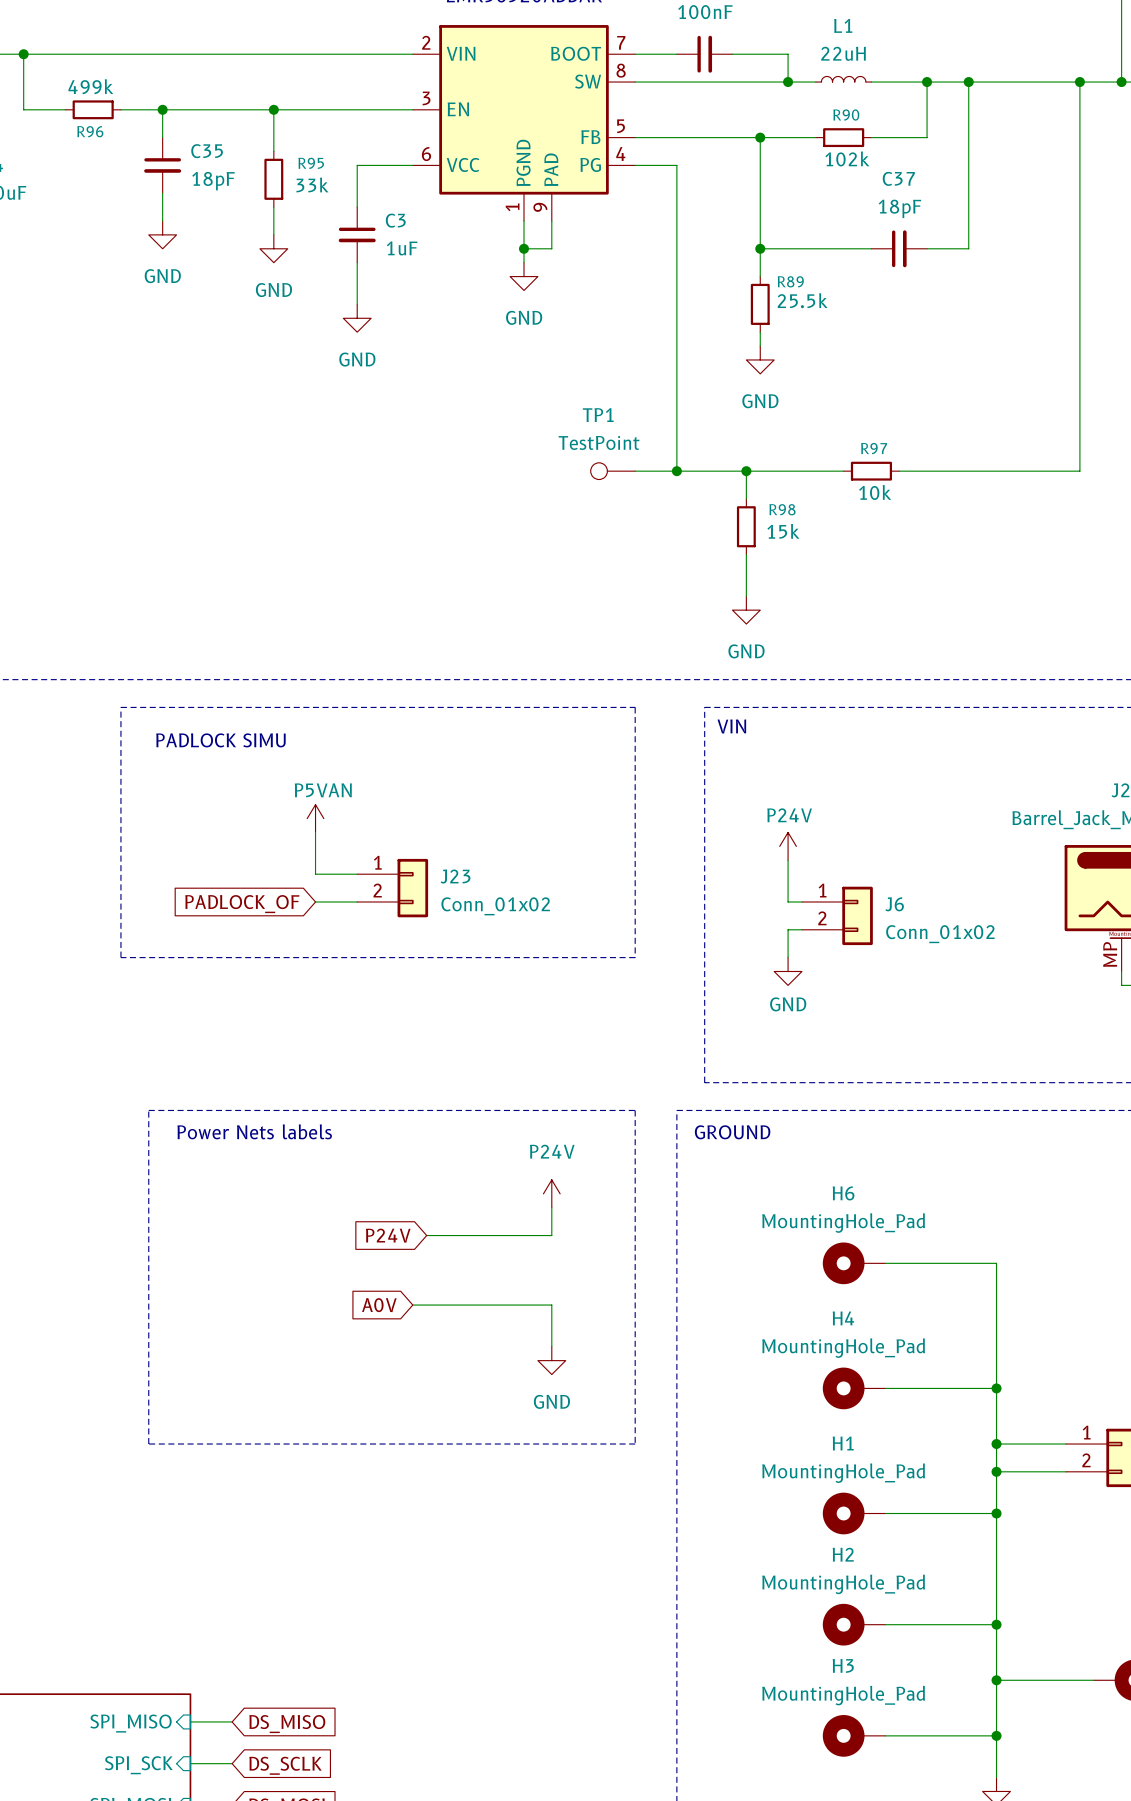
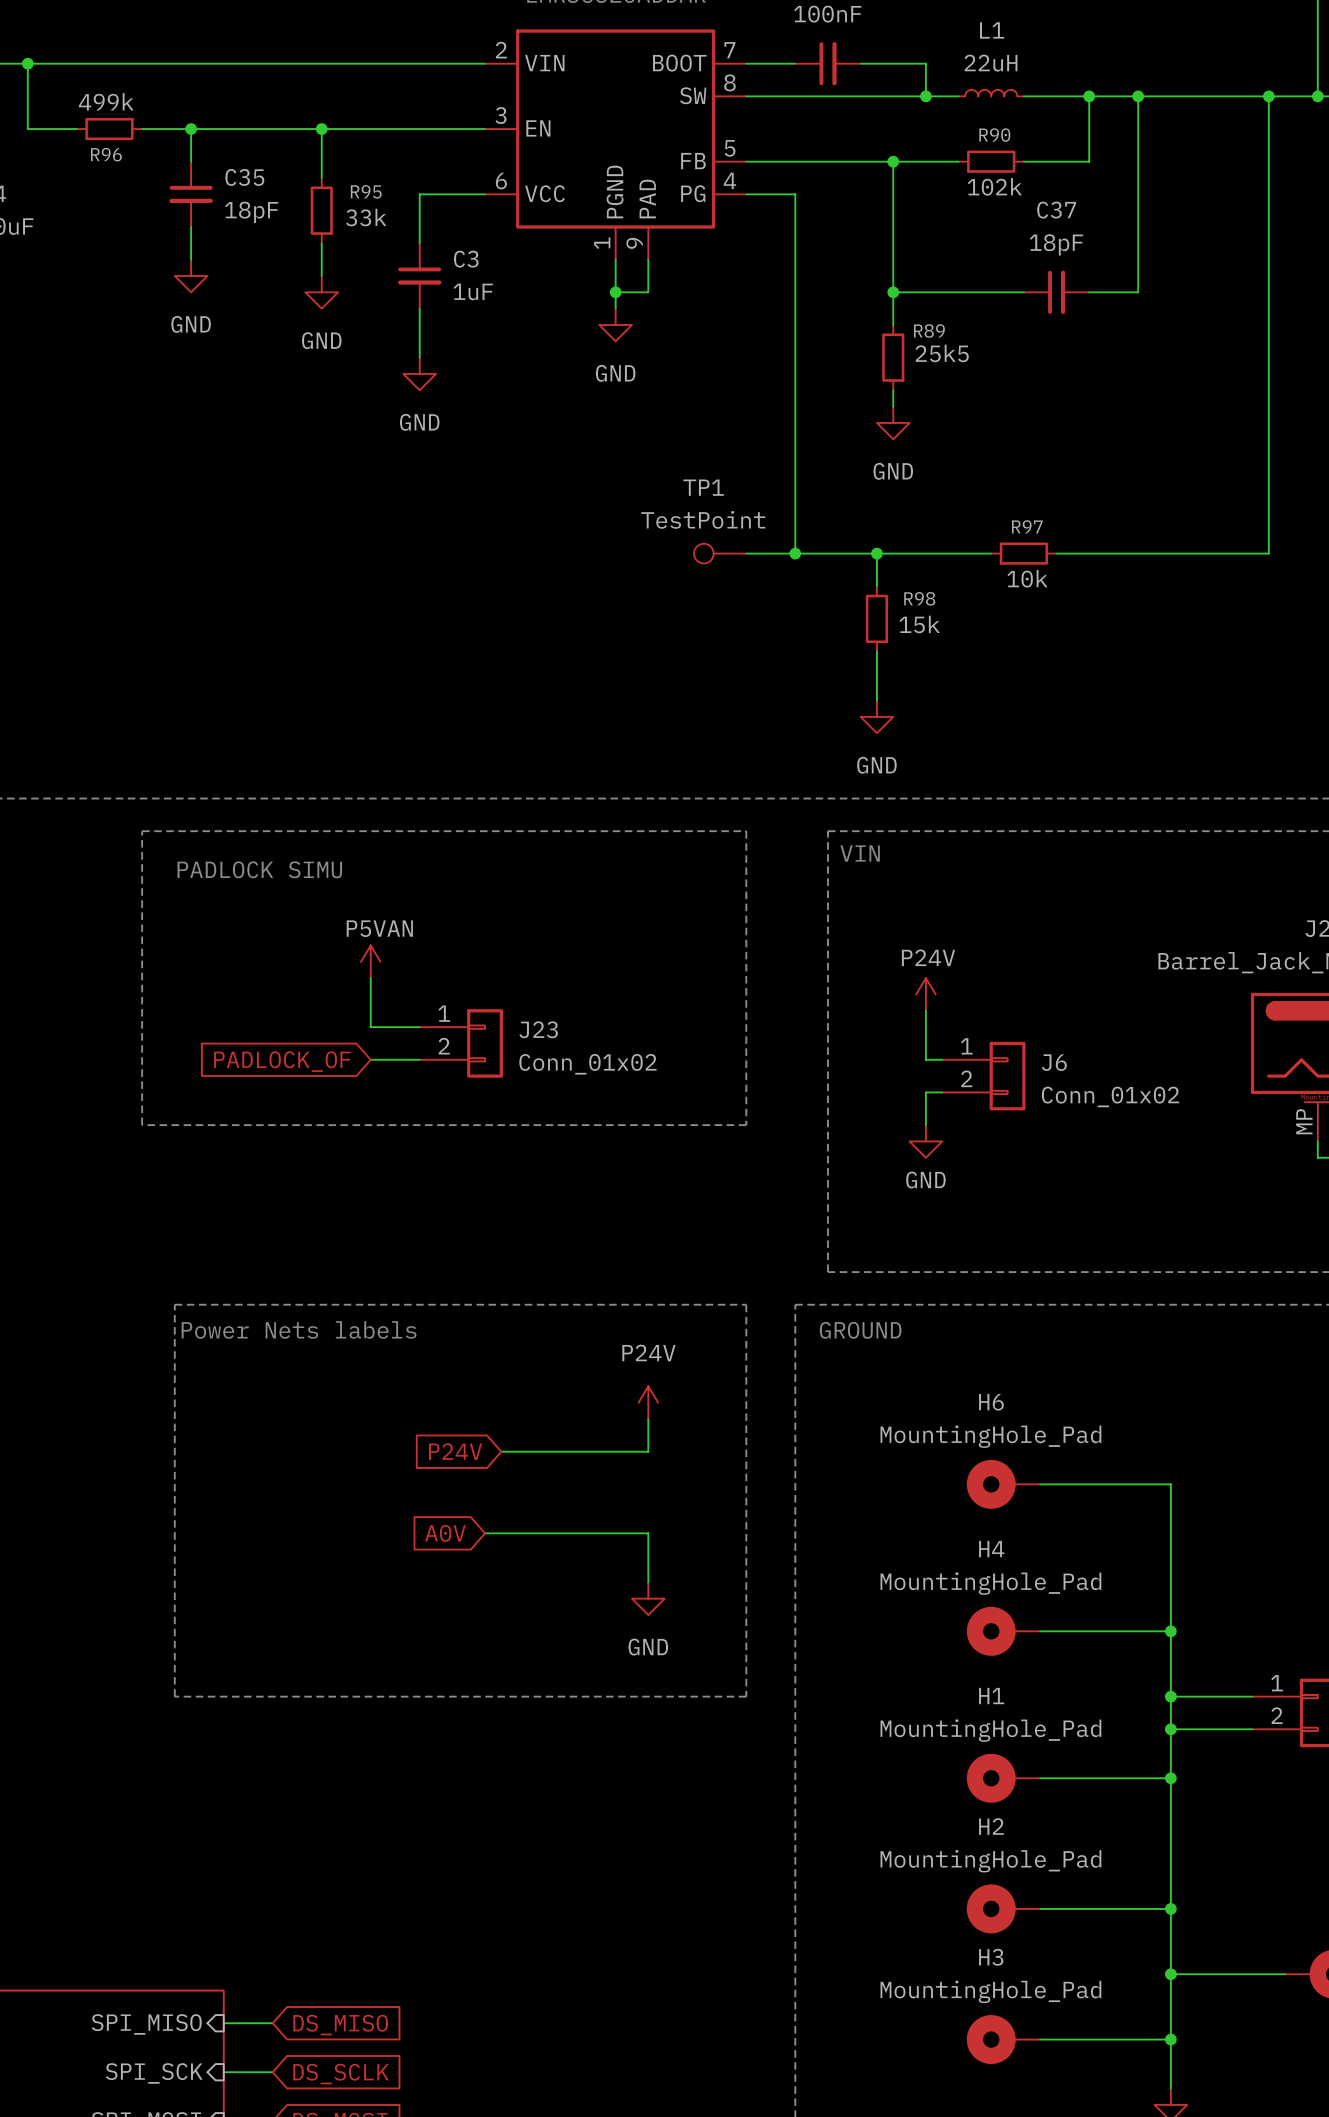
R89 value: 25.5k (802, 300) -> 25k5 (942, 353)

